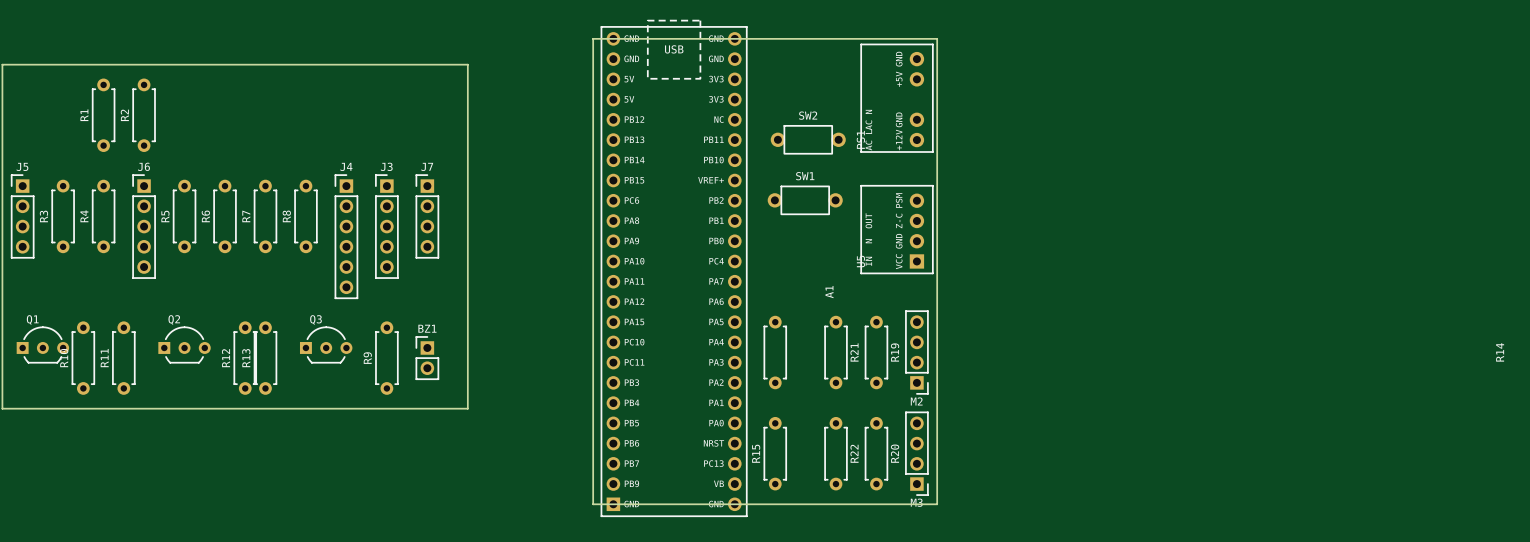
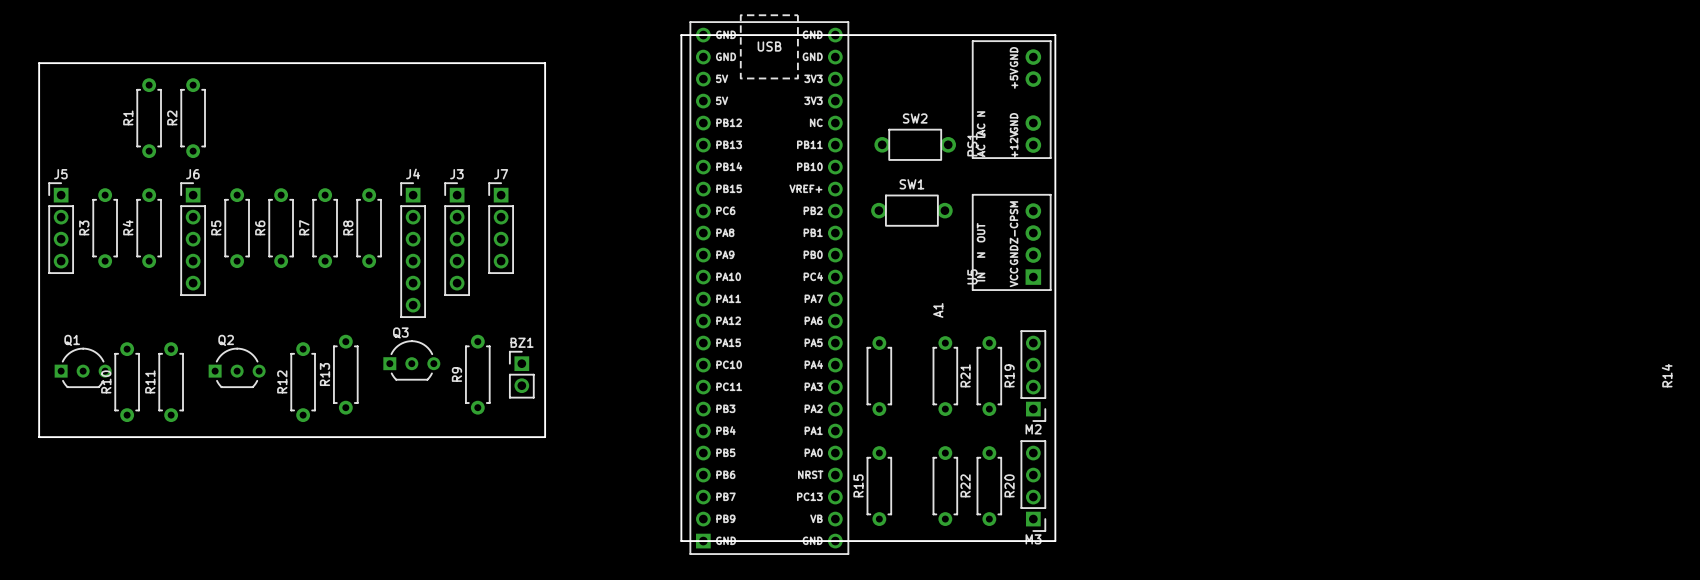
Q3 position: (326, 344) -> (411, 360)
R13 position: (265, 358) -> (345, 374)
R9 position: (386, 358) -> (477, 374)
BZ1 position: (427, 358) -> (521, 374)

